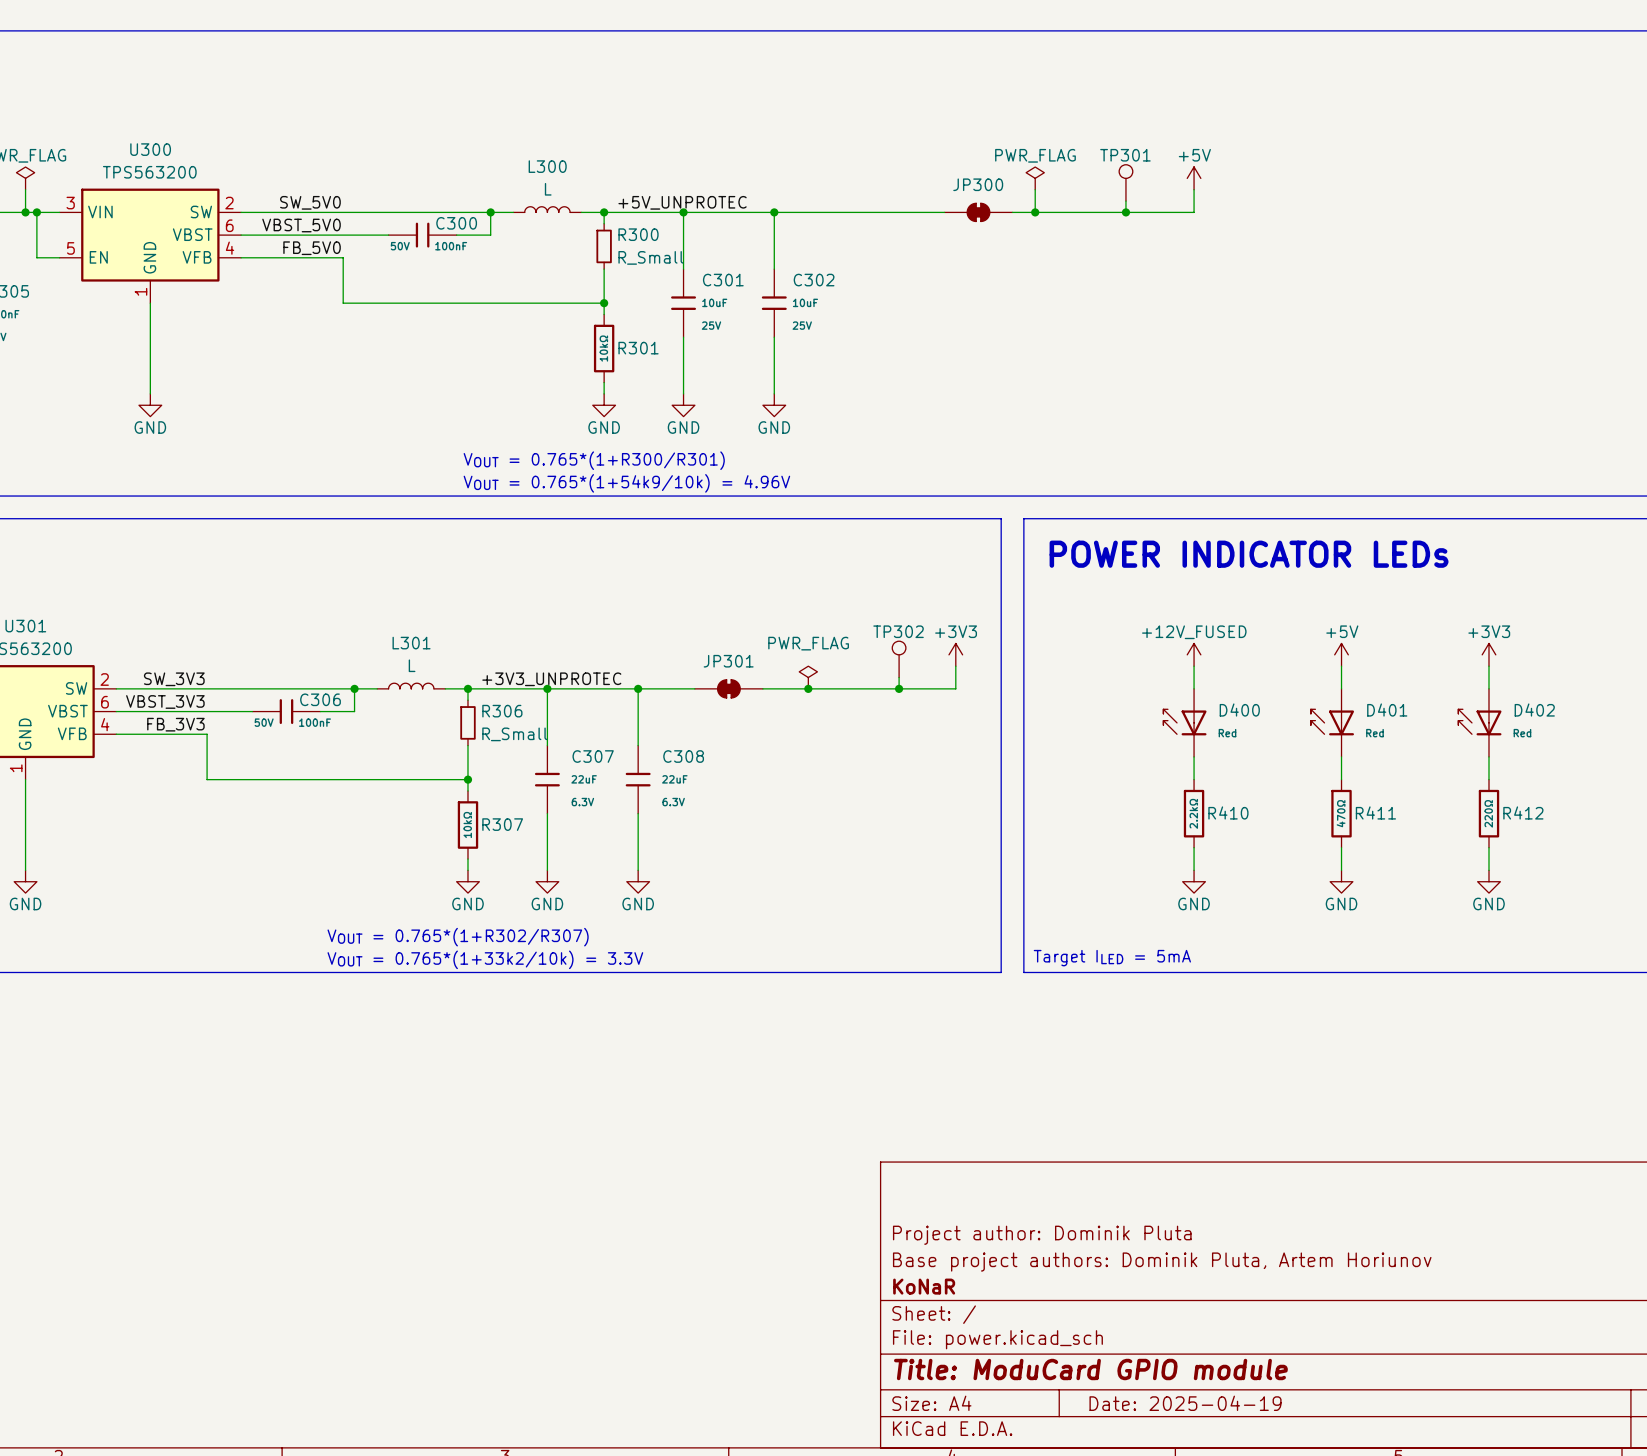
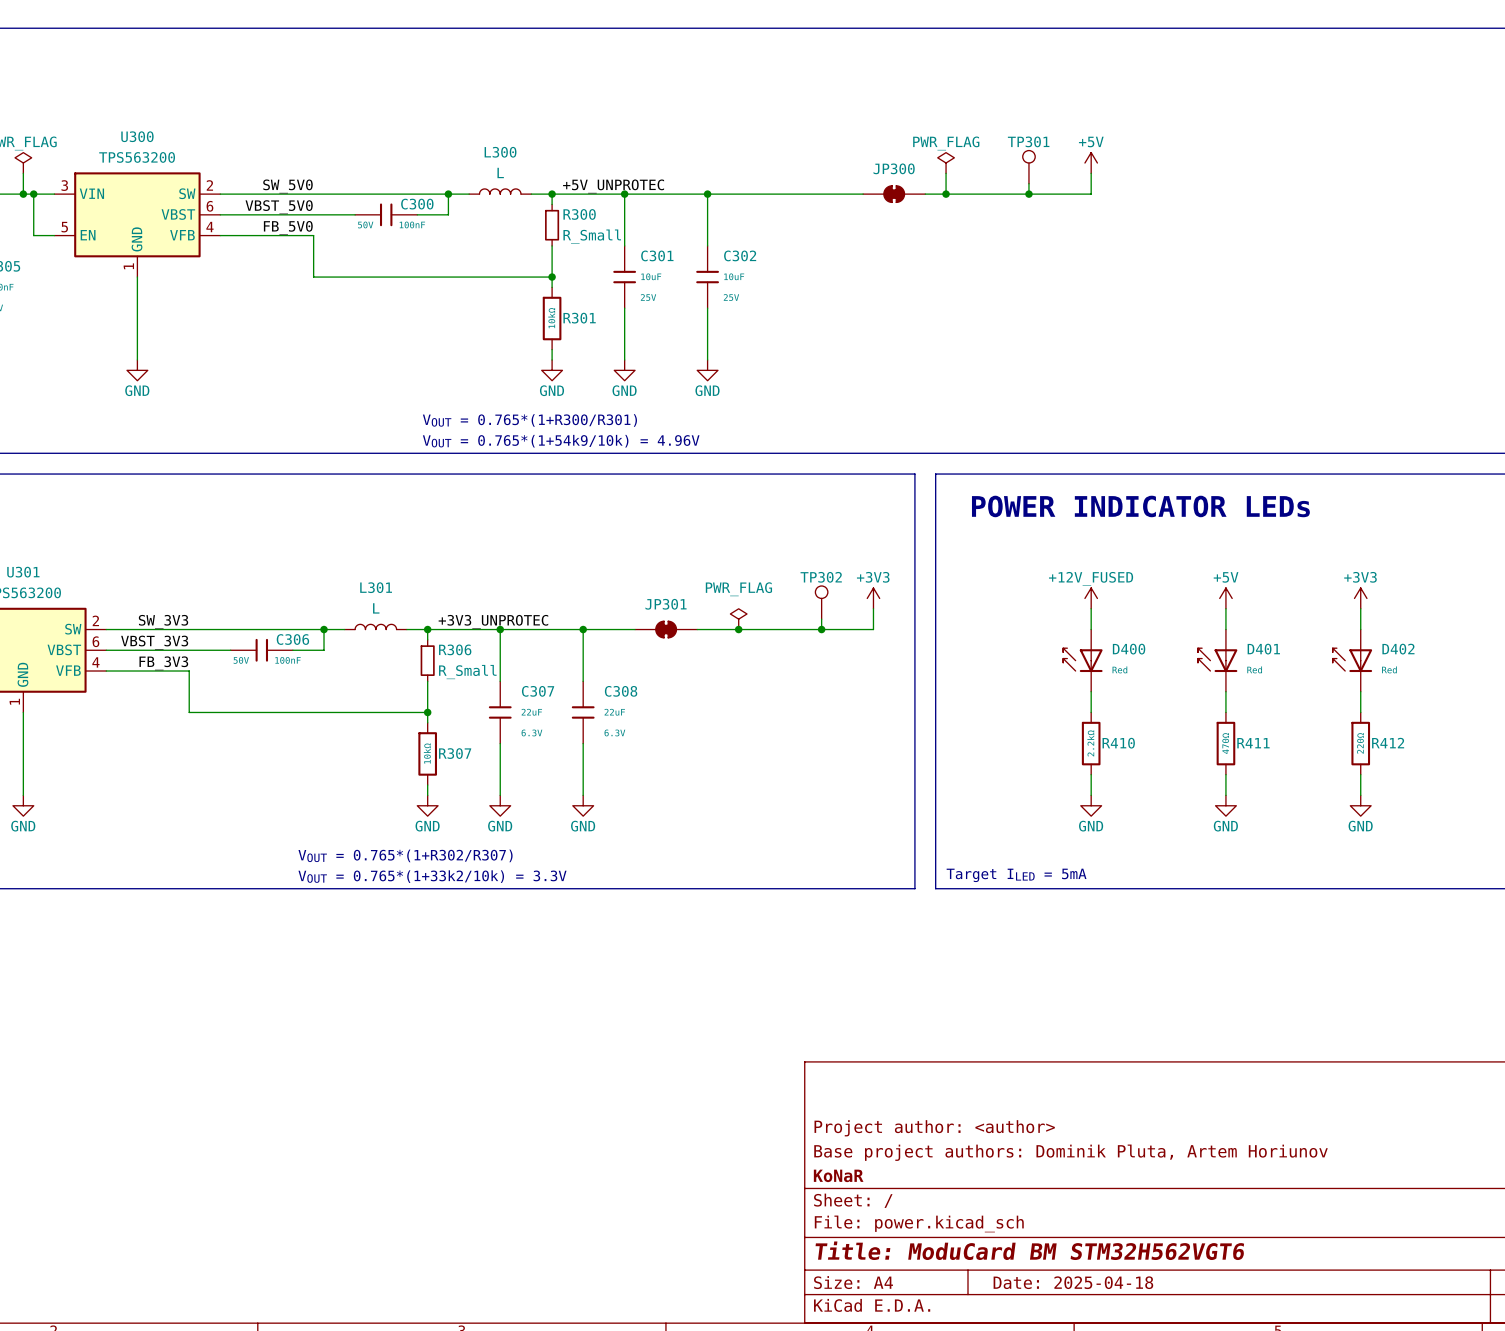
title block: Project author: Dominik Pluta (1042, 1235) -> Project author: <author> (934, 1128)
title block: Title: ModuCard GPIO module (1090, 1369) -> Title: ModuCard BM STM32H562VGT6 (1029, 1250)
title block: Date: 2025-04-19 (1185, 1403) -> Date: 2025-04-18 (1073, 1282)

